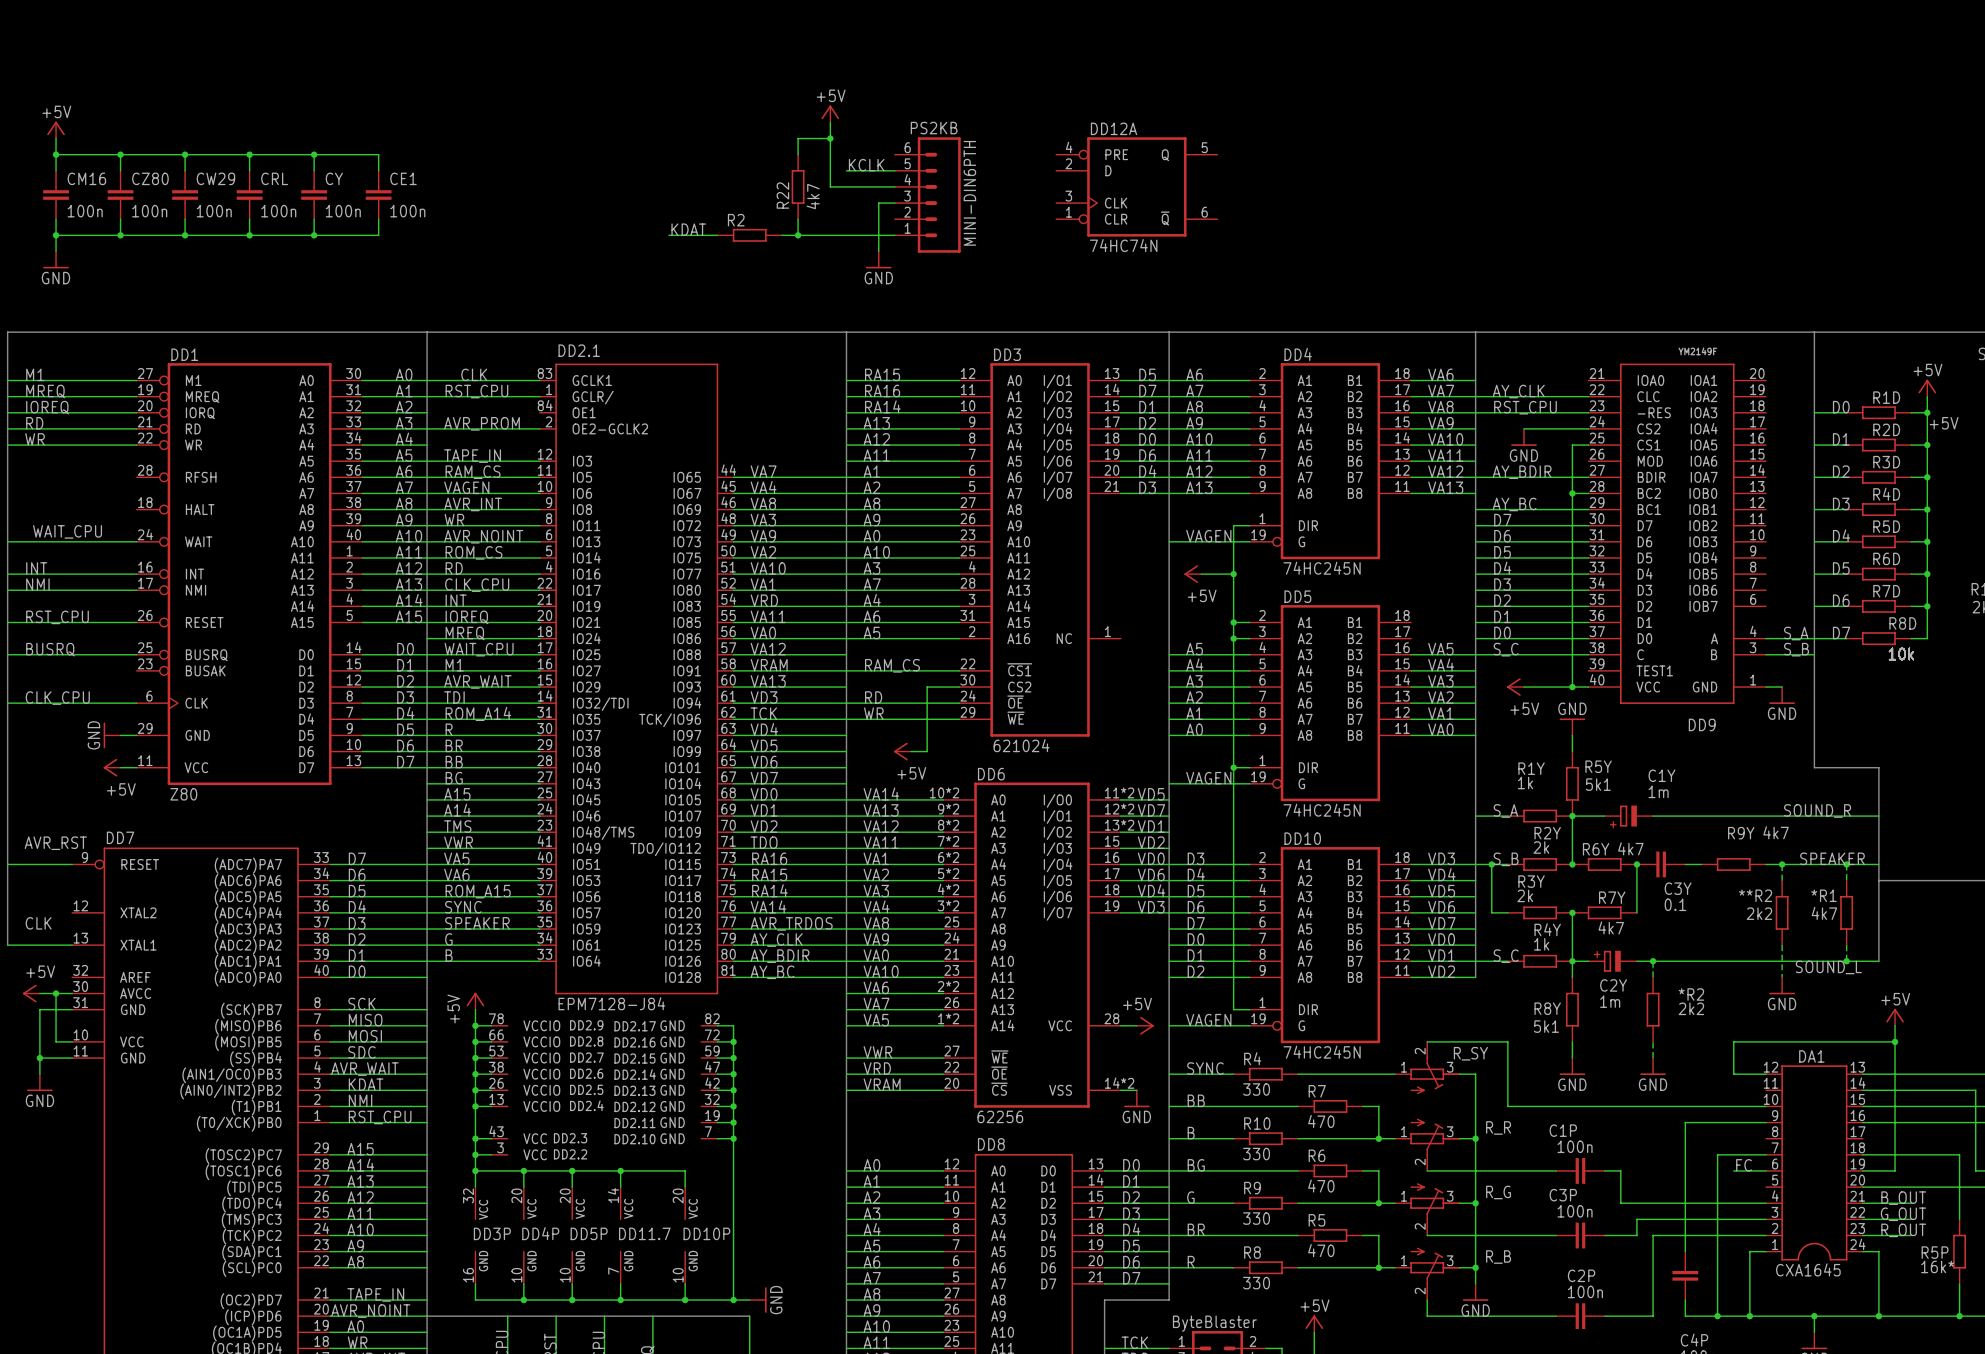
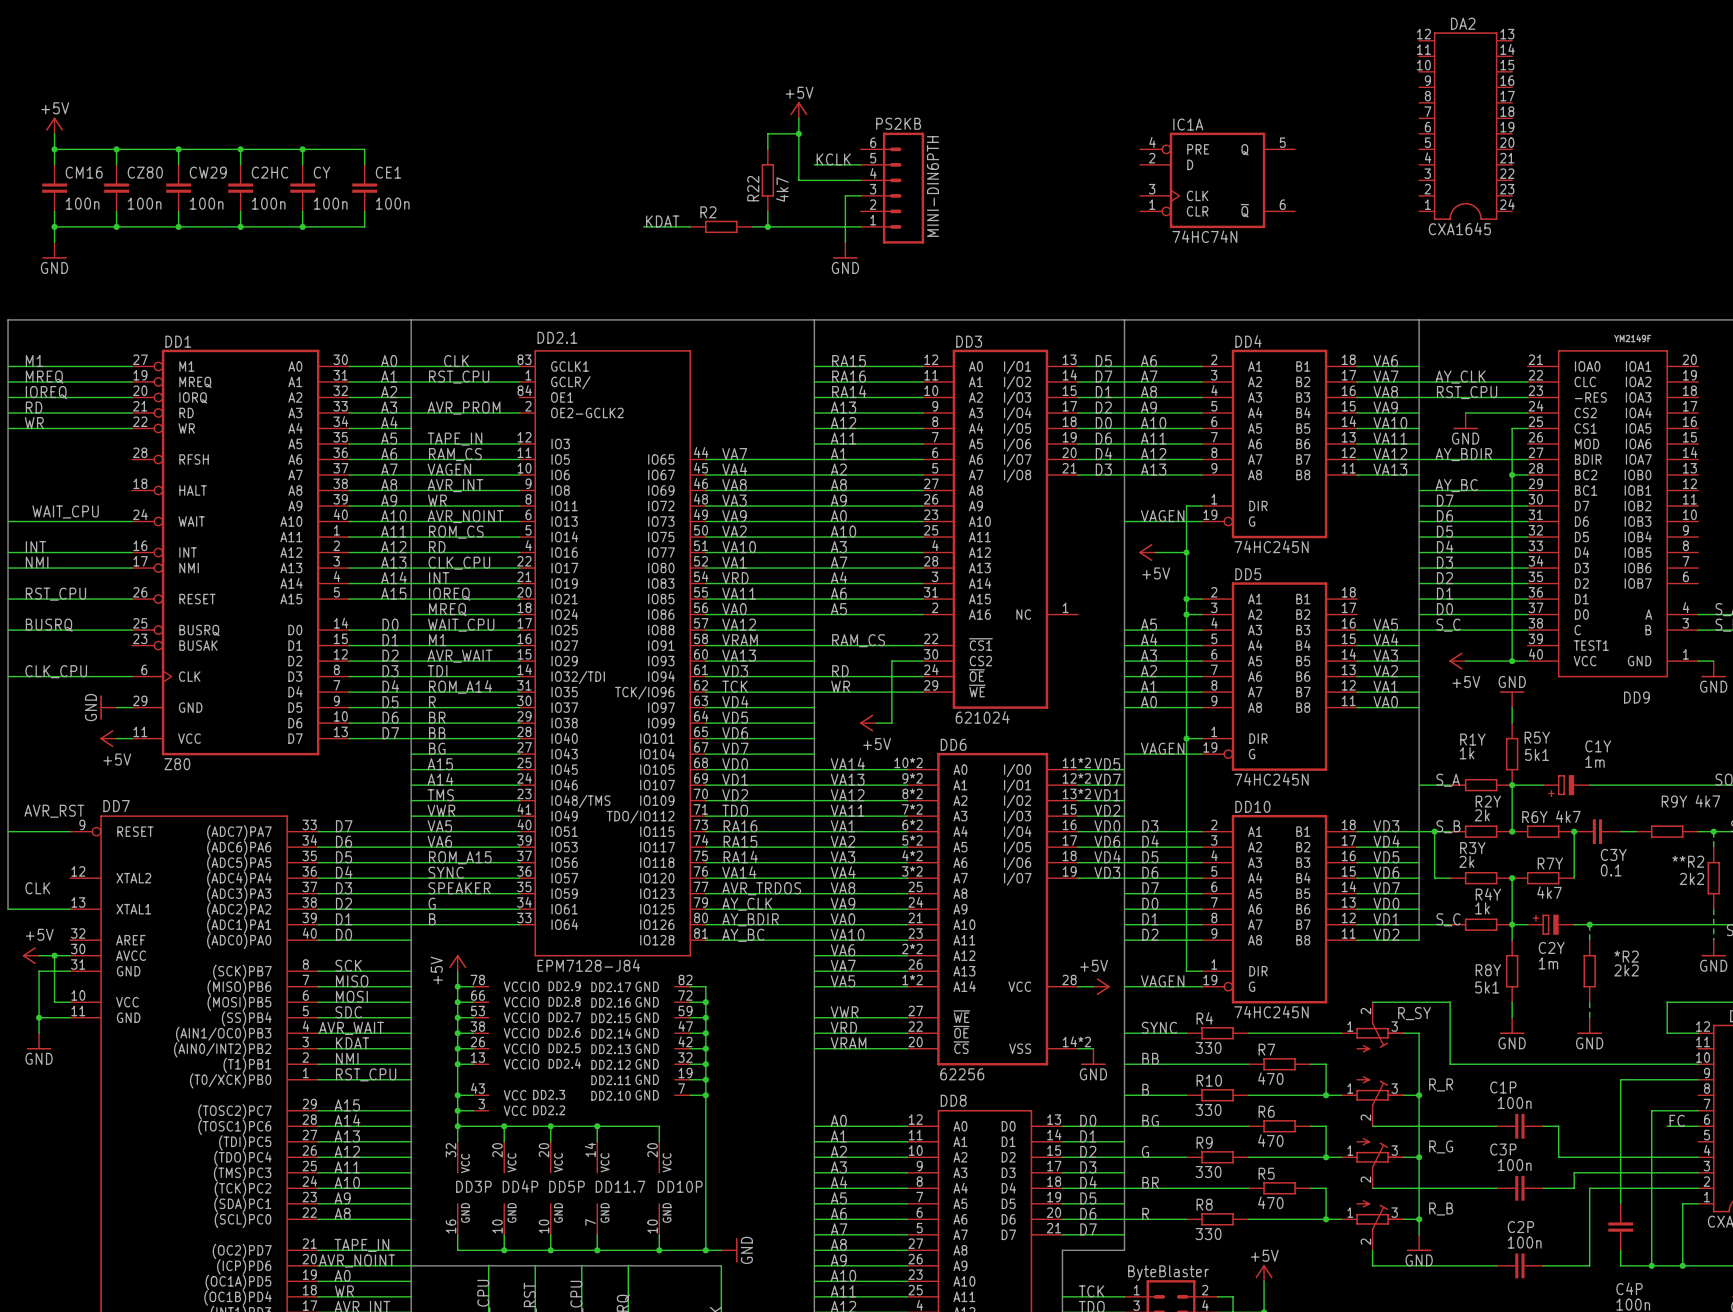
DA2: none -> CXA1645 (1465, 126)
CRL name: CRL (274, 178) -> C2HC (270, 172)
DD12A: 74HC74N (1136, 186) -> none
IC1A: none -> 74HC74N (1217, 180)

